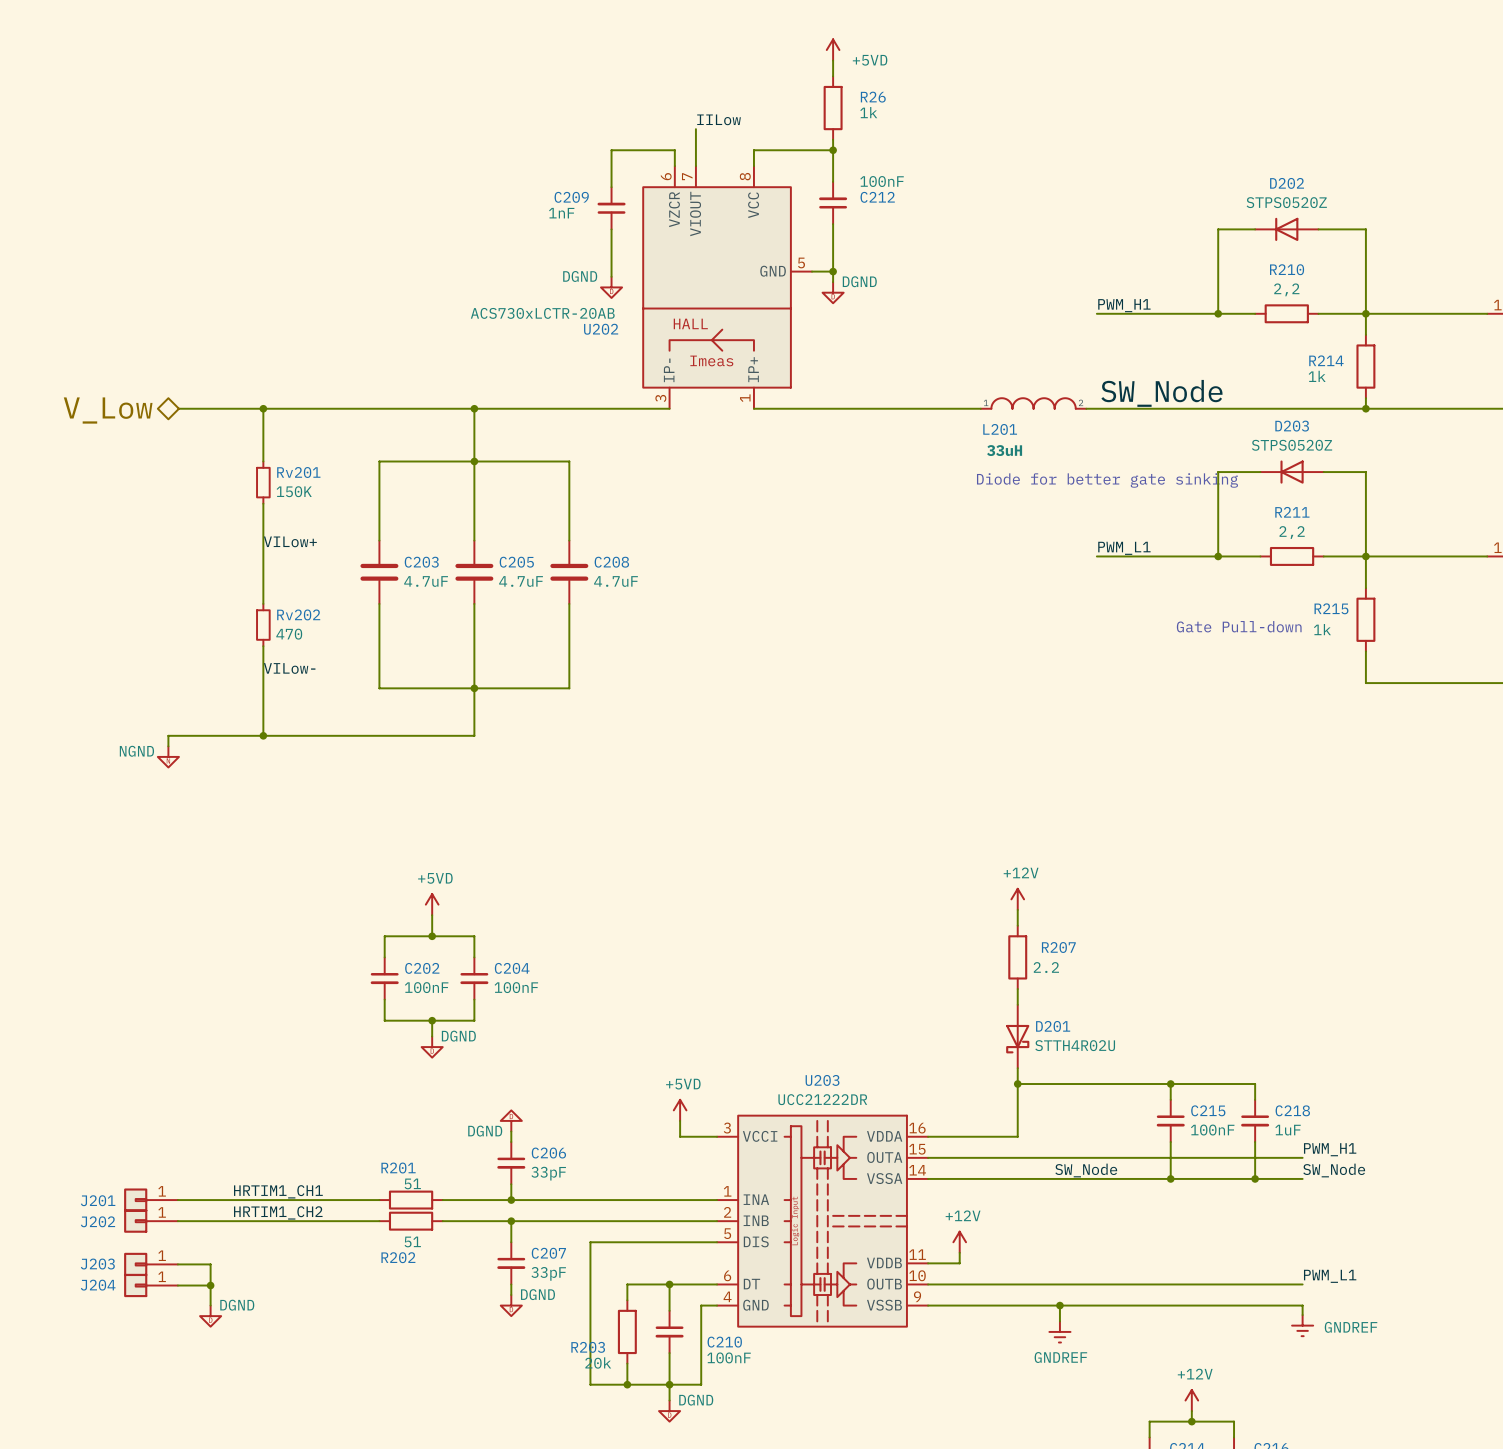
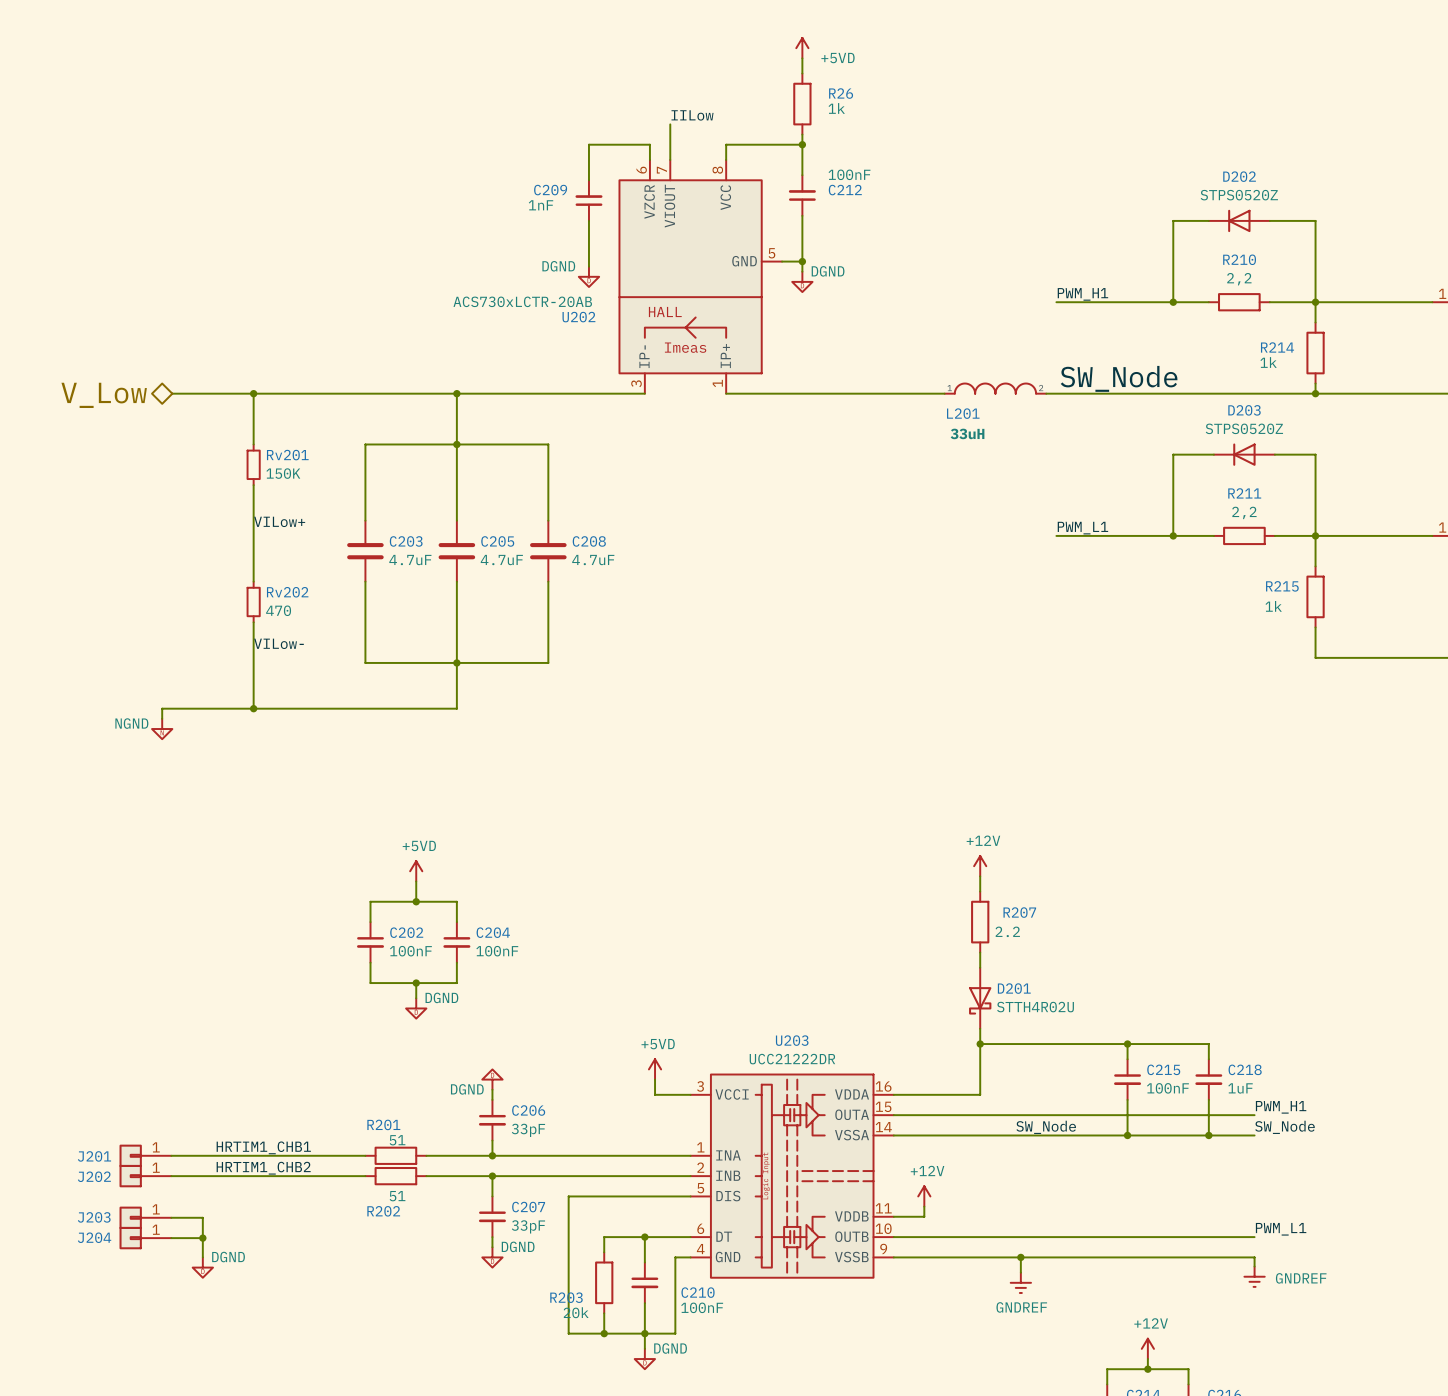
text: Diode for better gate sinking (1107, 480) -> none
text: Gate Pull-down (1239, 626) -> none
label: HRTIM1_CH1 (278, 1191) -> HRTIM1_CHB1 (263, 1147)
label: HRTIM1_CH2 (278, 1212) -> HRTIM1_CHB2 (263, 1168)

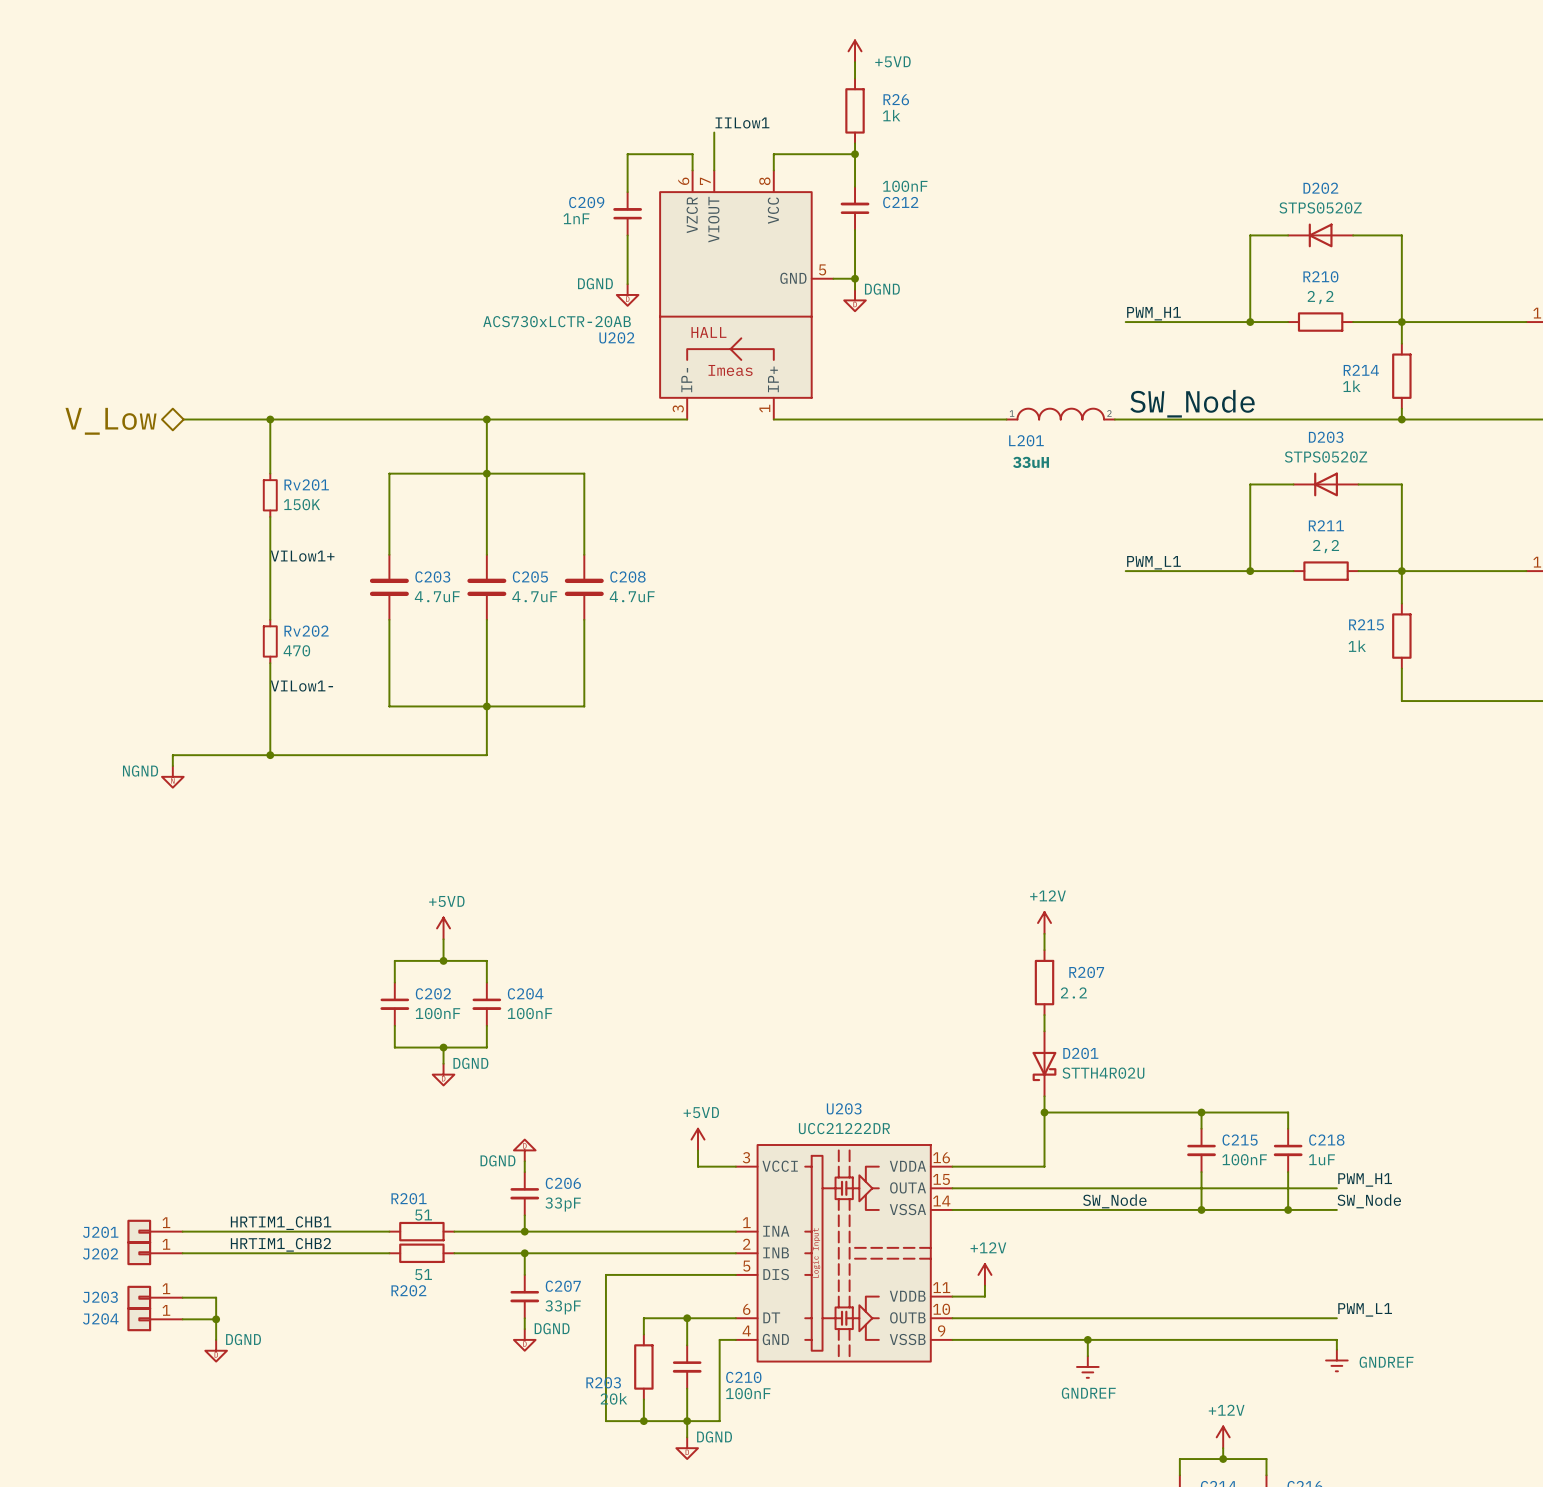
label: IILow (692, 115) -> IILow1 (742, 122)
label: VILow+ (279, 521) -> VILow1+ (302, 556)
label: VILow- (278, 643) -> VILow1- (301, 686)

